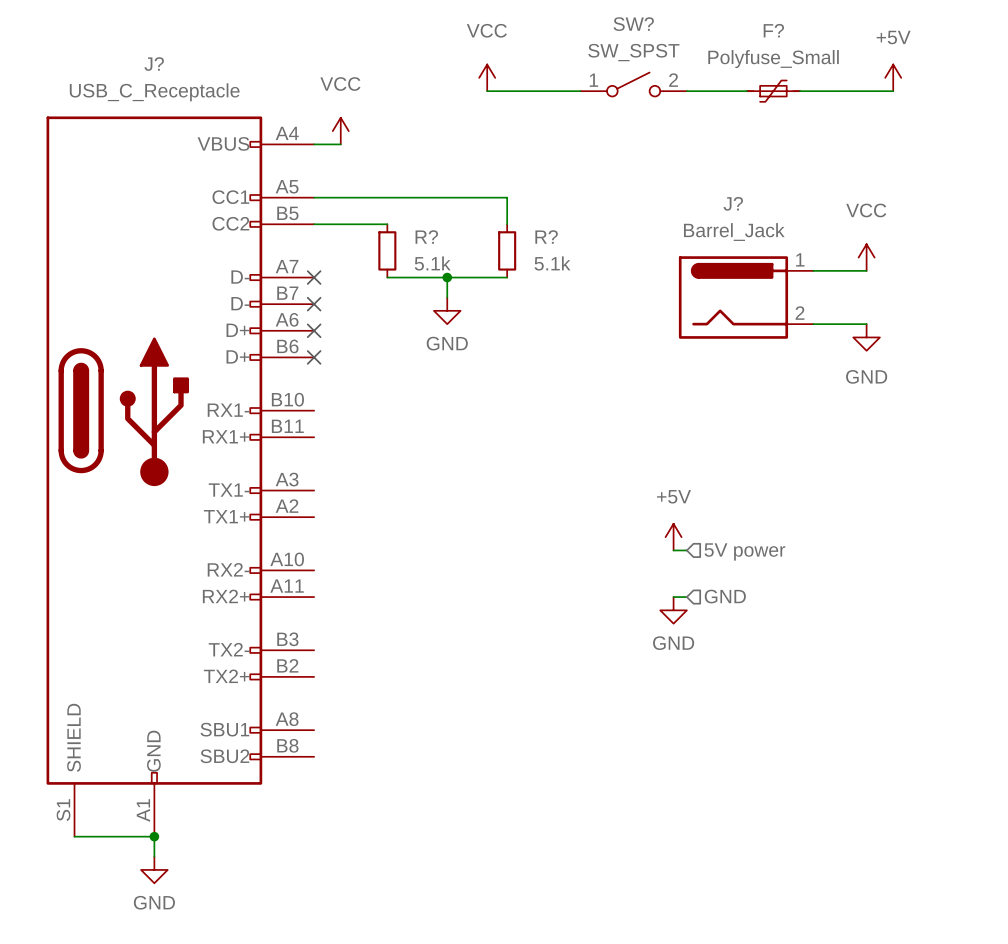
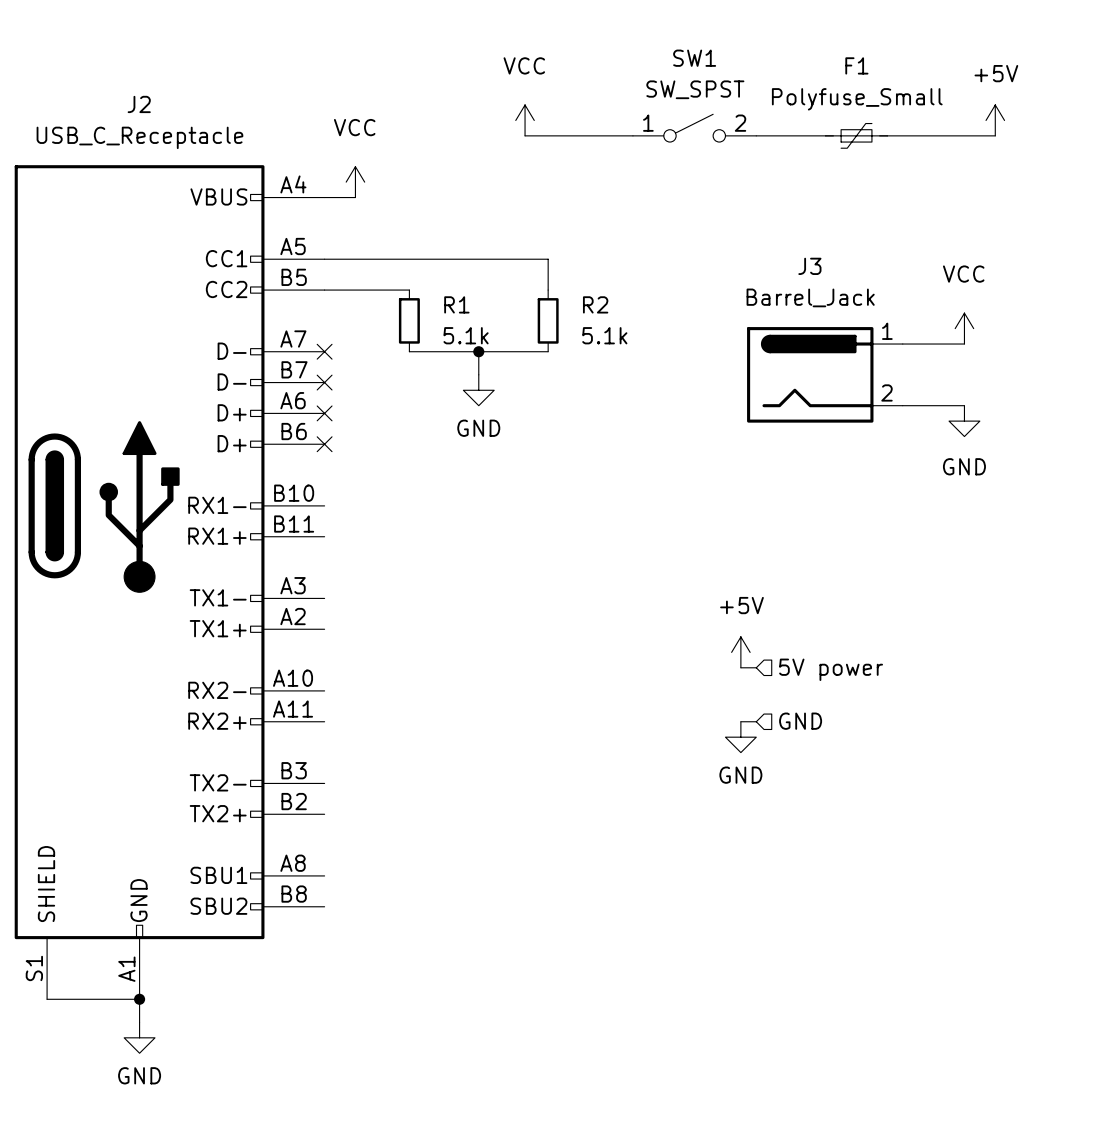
SW? name: SW? (633, 24) -> SW1 (694, 58)
F? name: F? (773, 30) -> F1 (856, 65)
J? name: J? (154, 64) -> J2 (139, 104)
J? name: J? (733, 203) -> J3 (809, 266)
R? name: R? (426, 237) -> R1 (456, 304)
R? name: R? (546, 237) -> R2 (595, 304)

